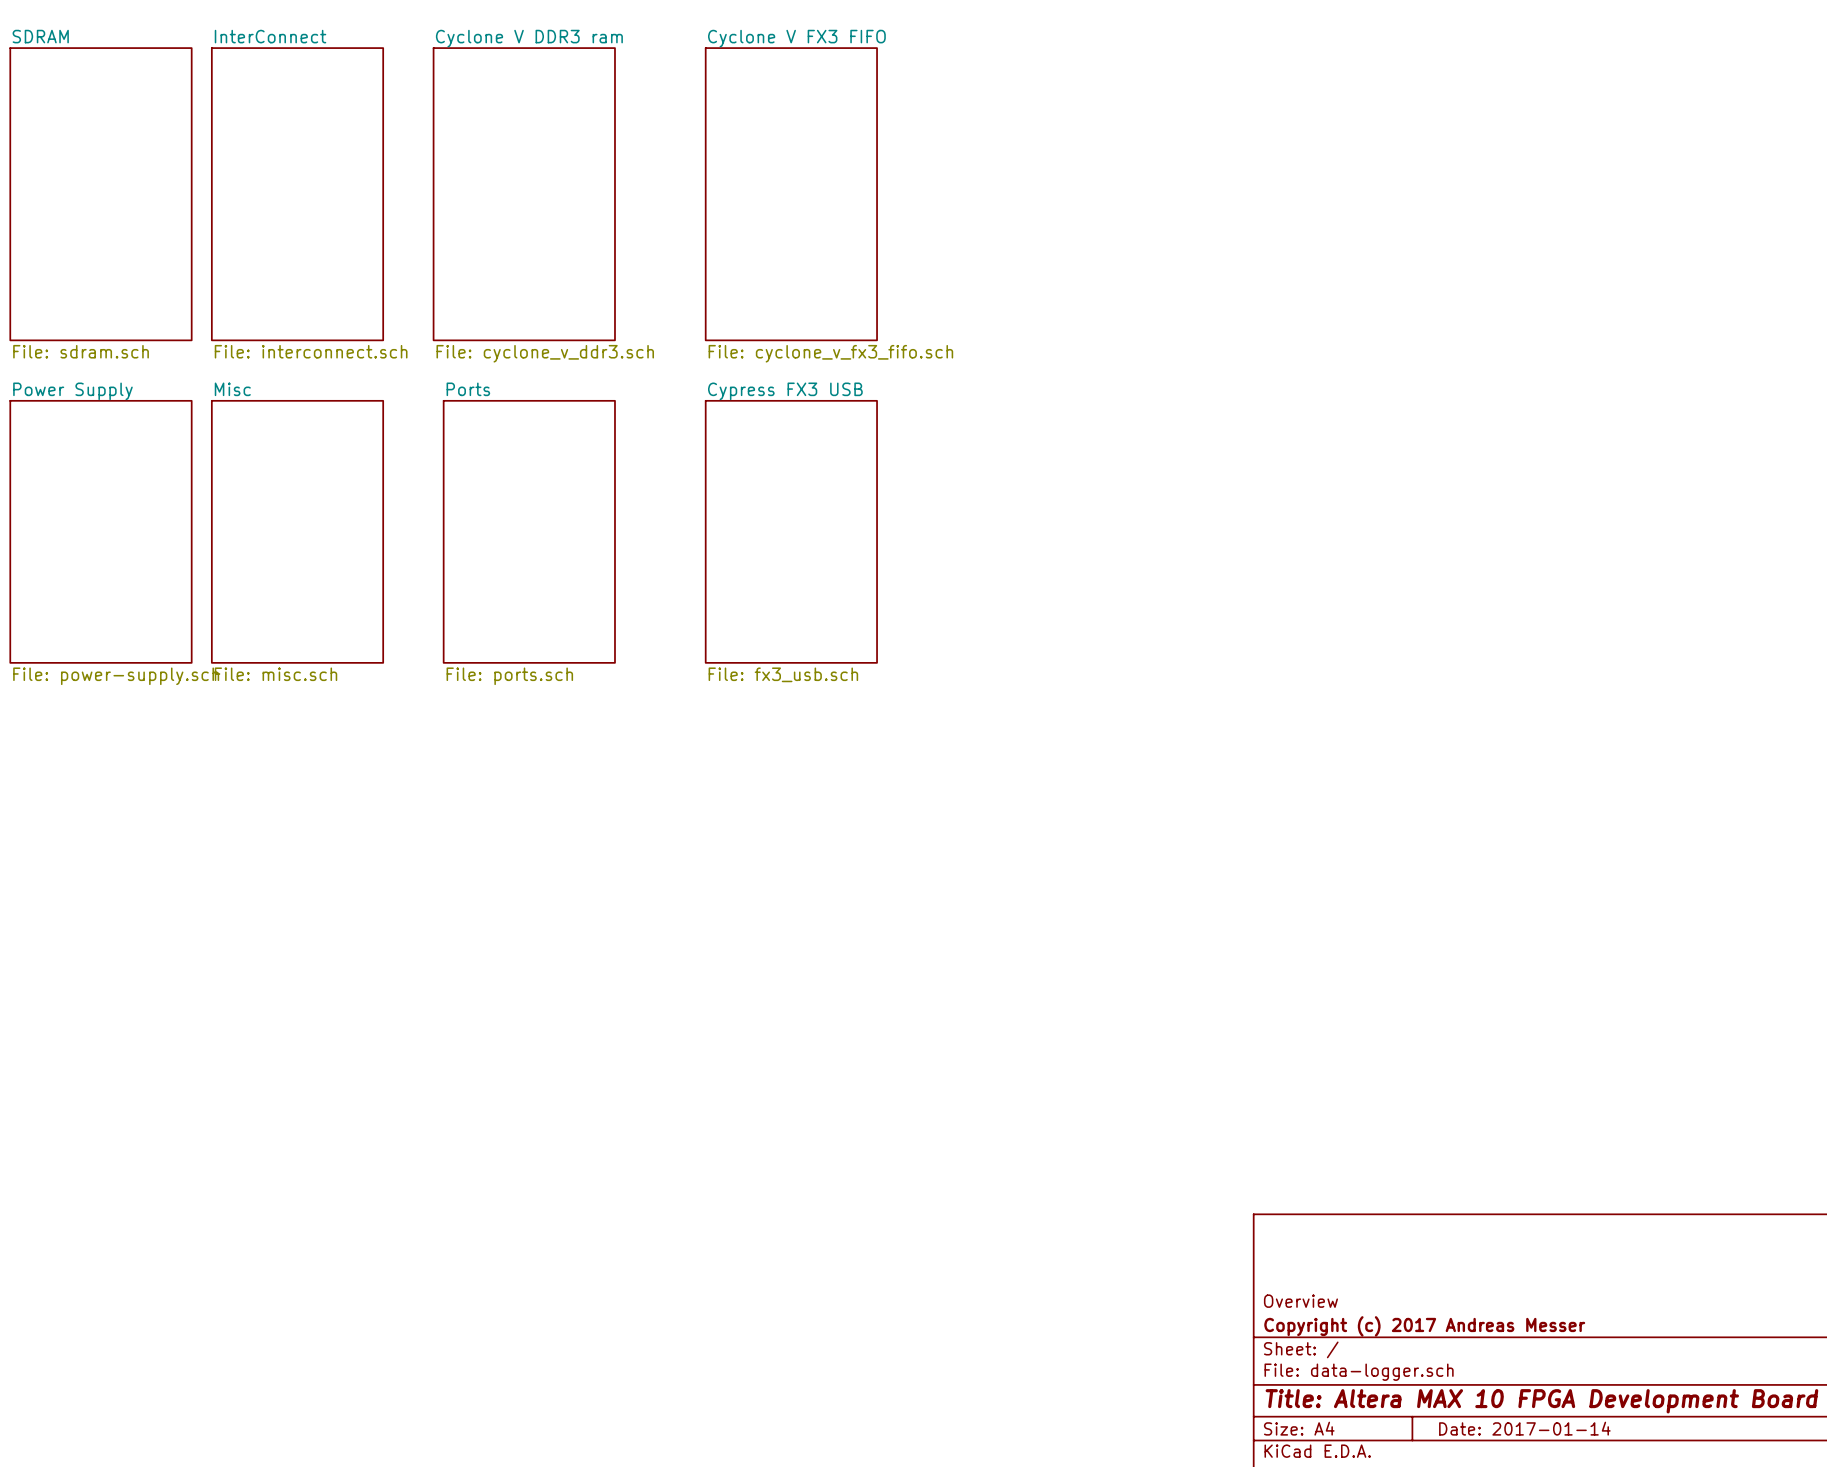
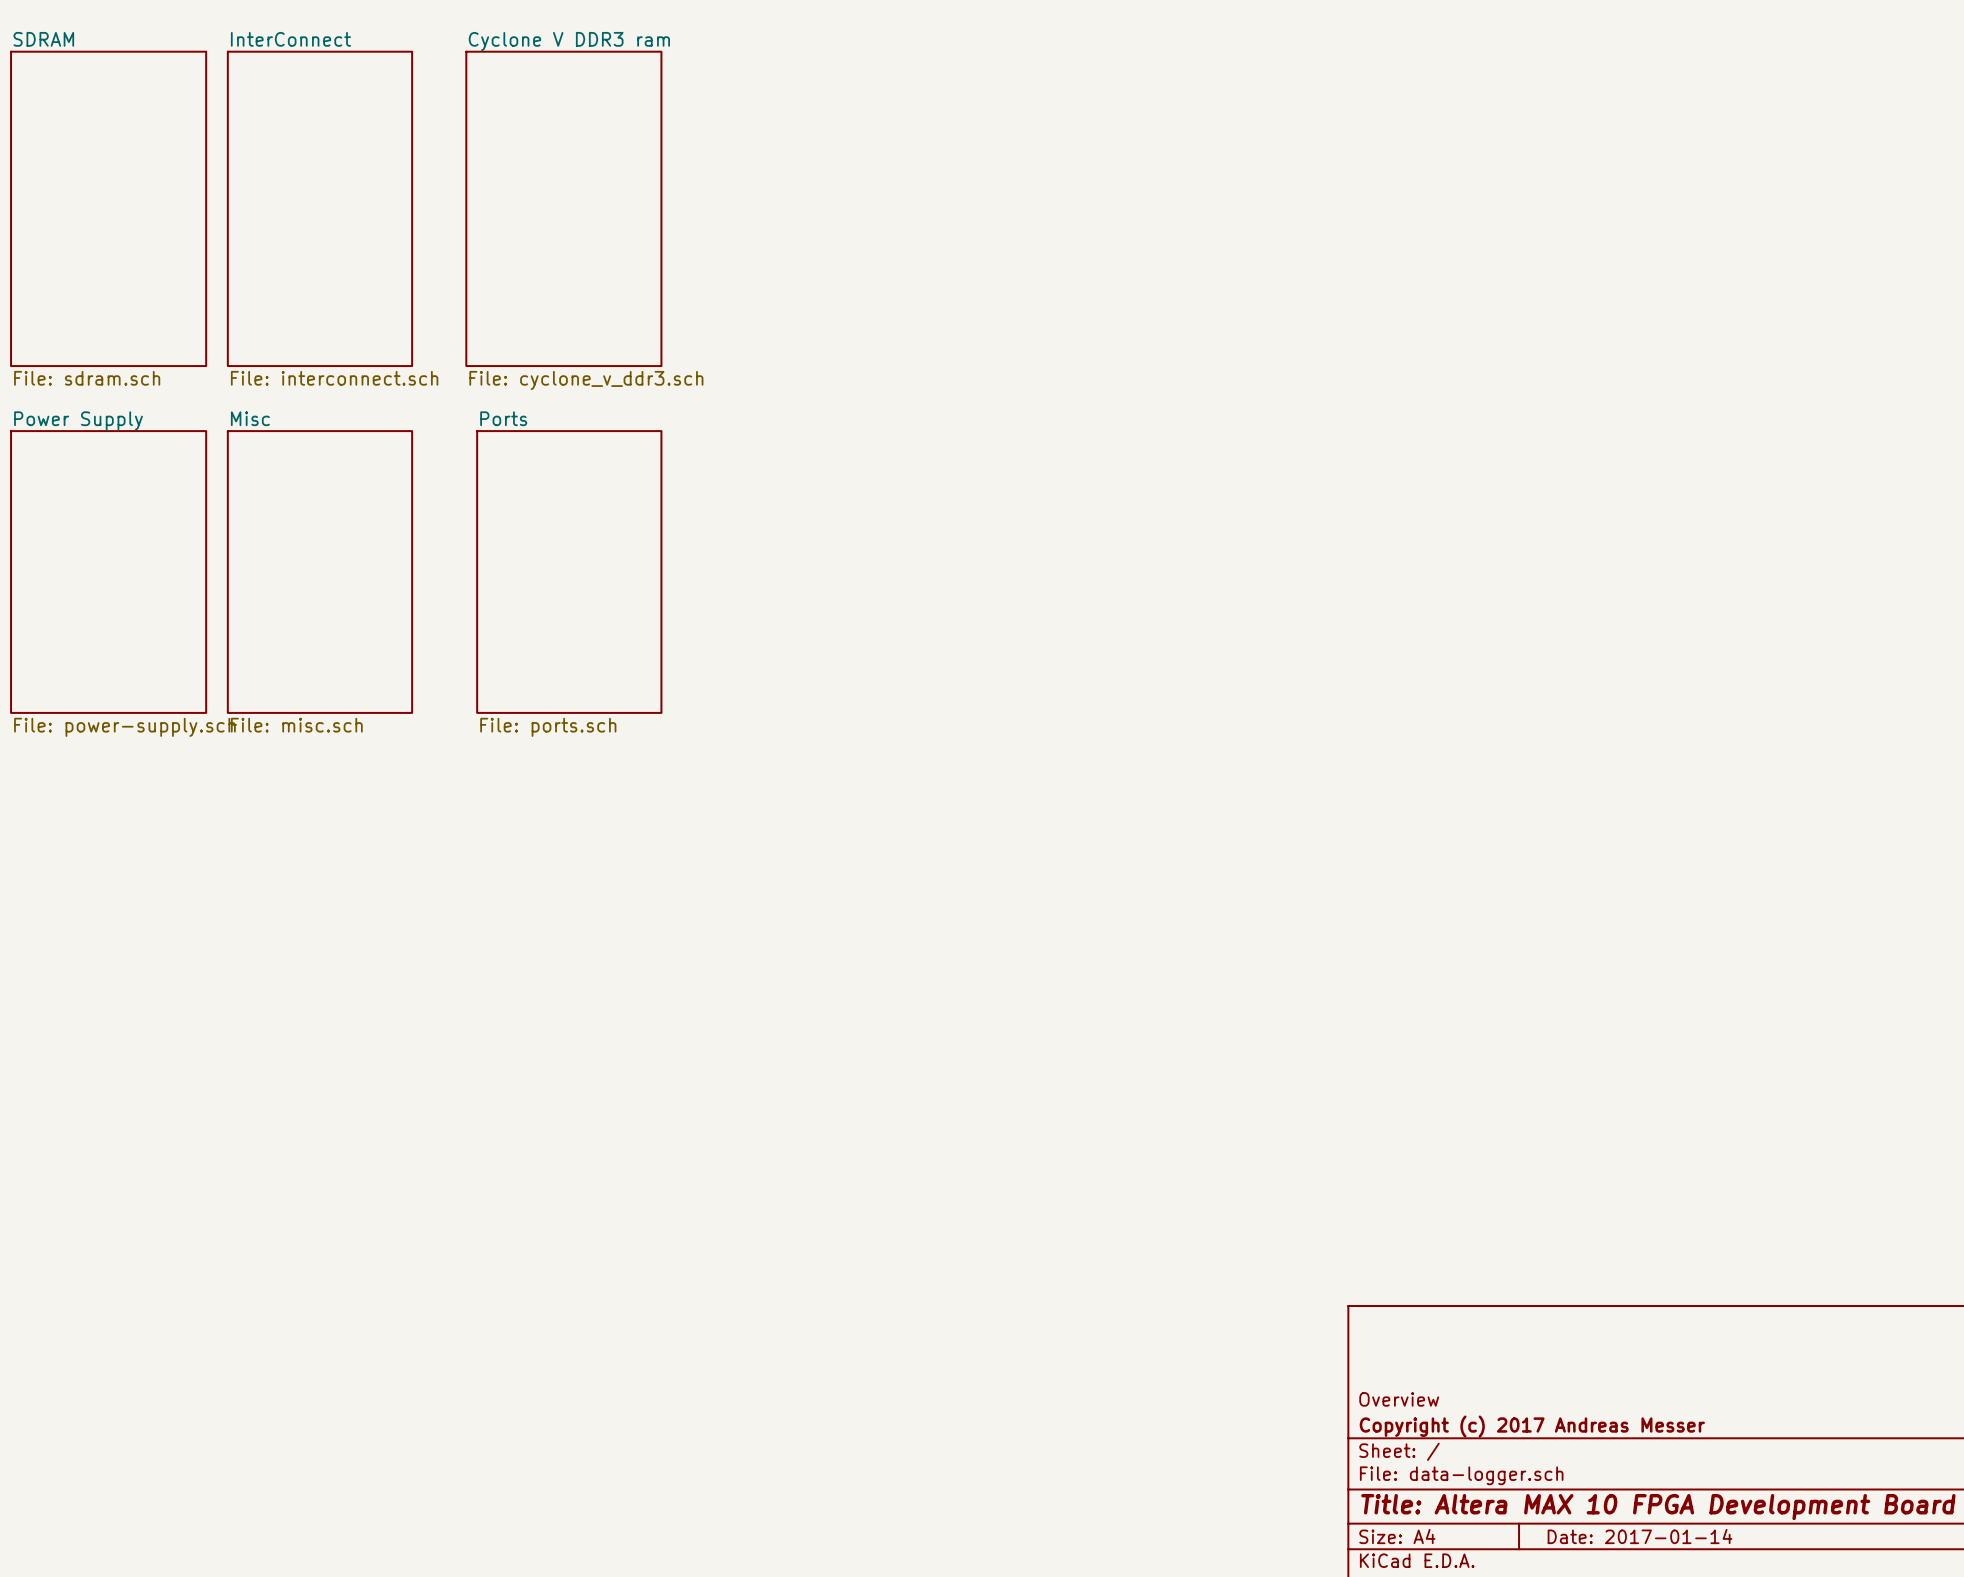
sheet Cyclone V FX3 FIFO: File: cyclone_v_fx3_fifo.sch (791, 194) -> none
sheet Cypress FX3 USB: File: fx3_usb.sch (791, 531) -> none

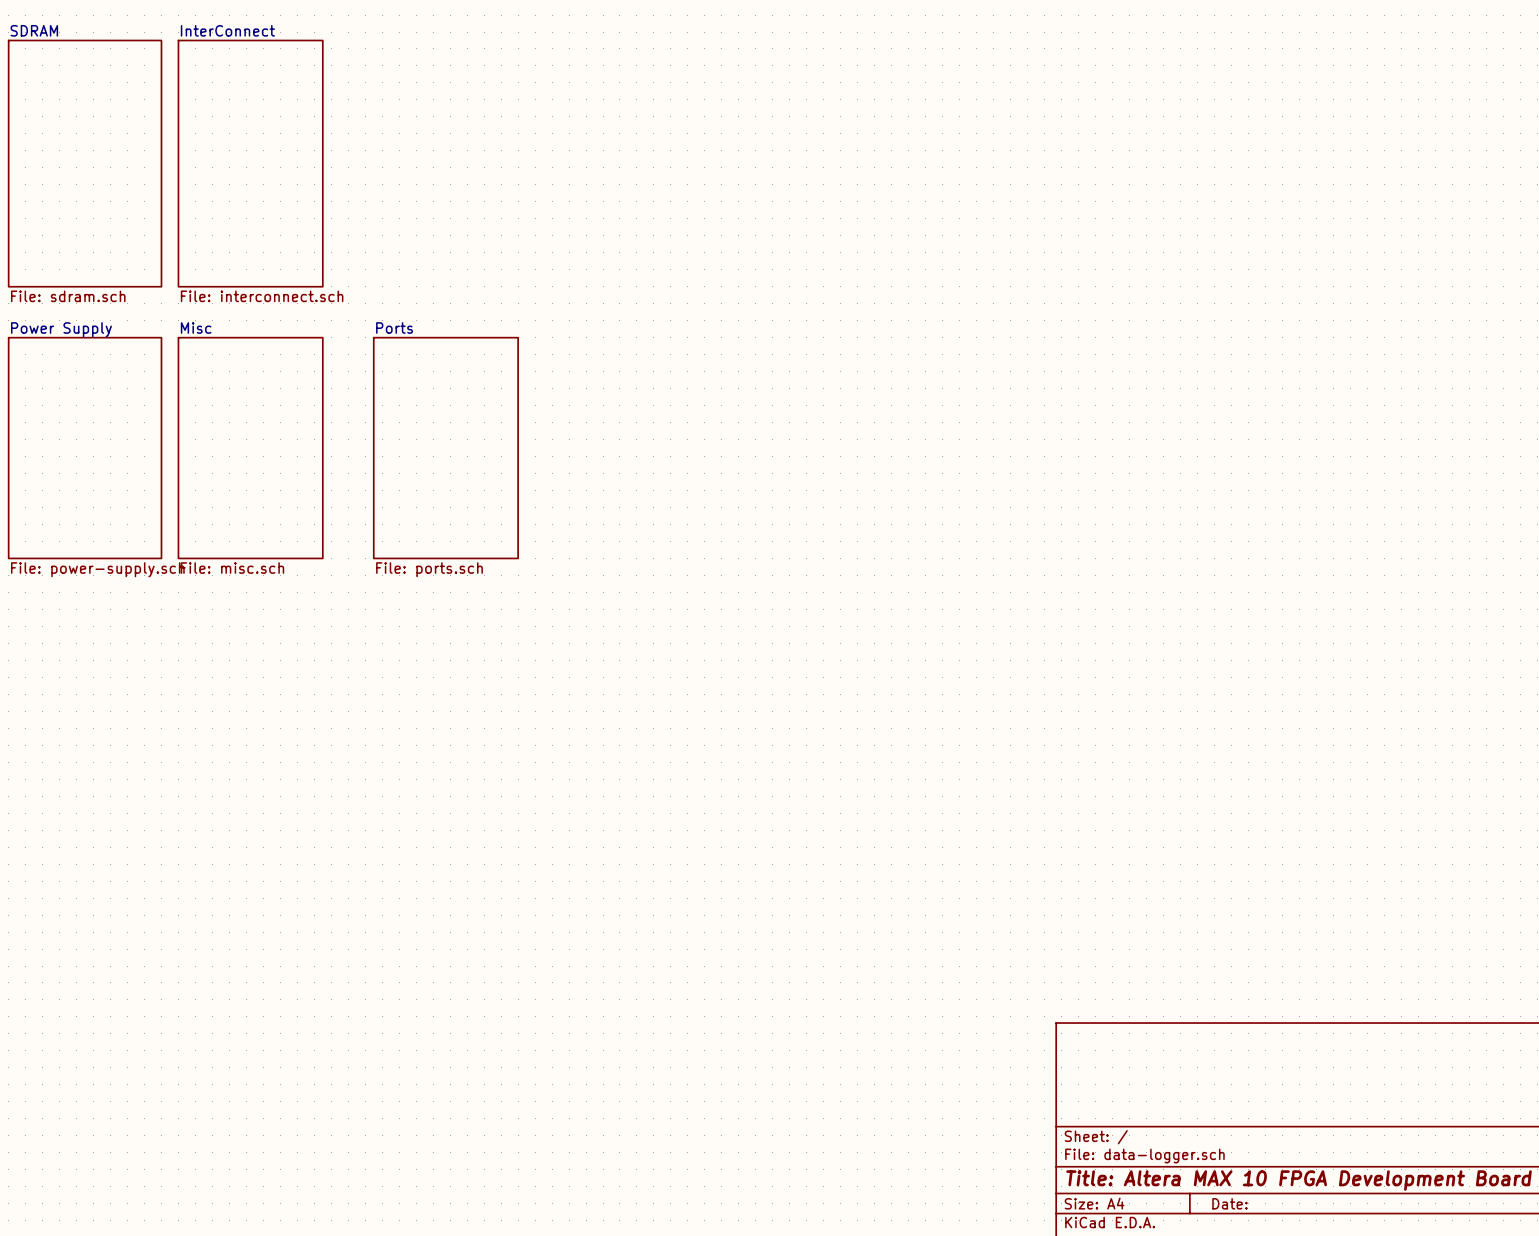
sheet Cyclone V DDR3 ram: File: cyclone_v_ddr3.sch (563, 208) -> none
title block: Overview (1399, 1399) -> none
title block: Copyright (c) 2017 Andreas Messer (1532, 1426) -> none
title block: Date: 2017-01-14 (1640, 1536) -> Date: (1229, 1203)

